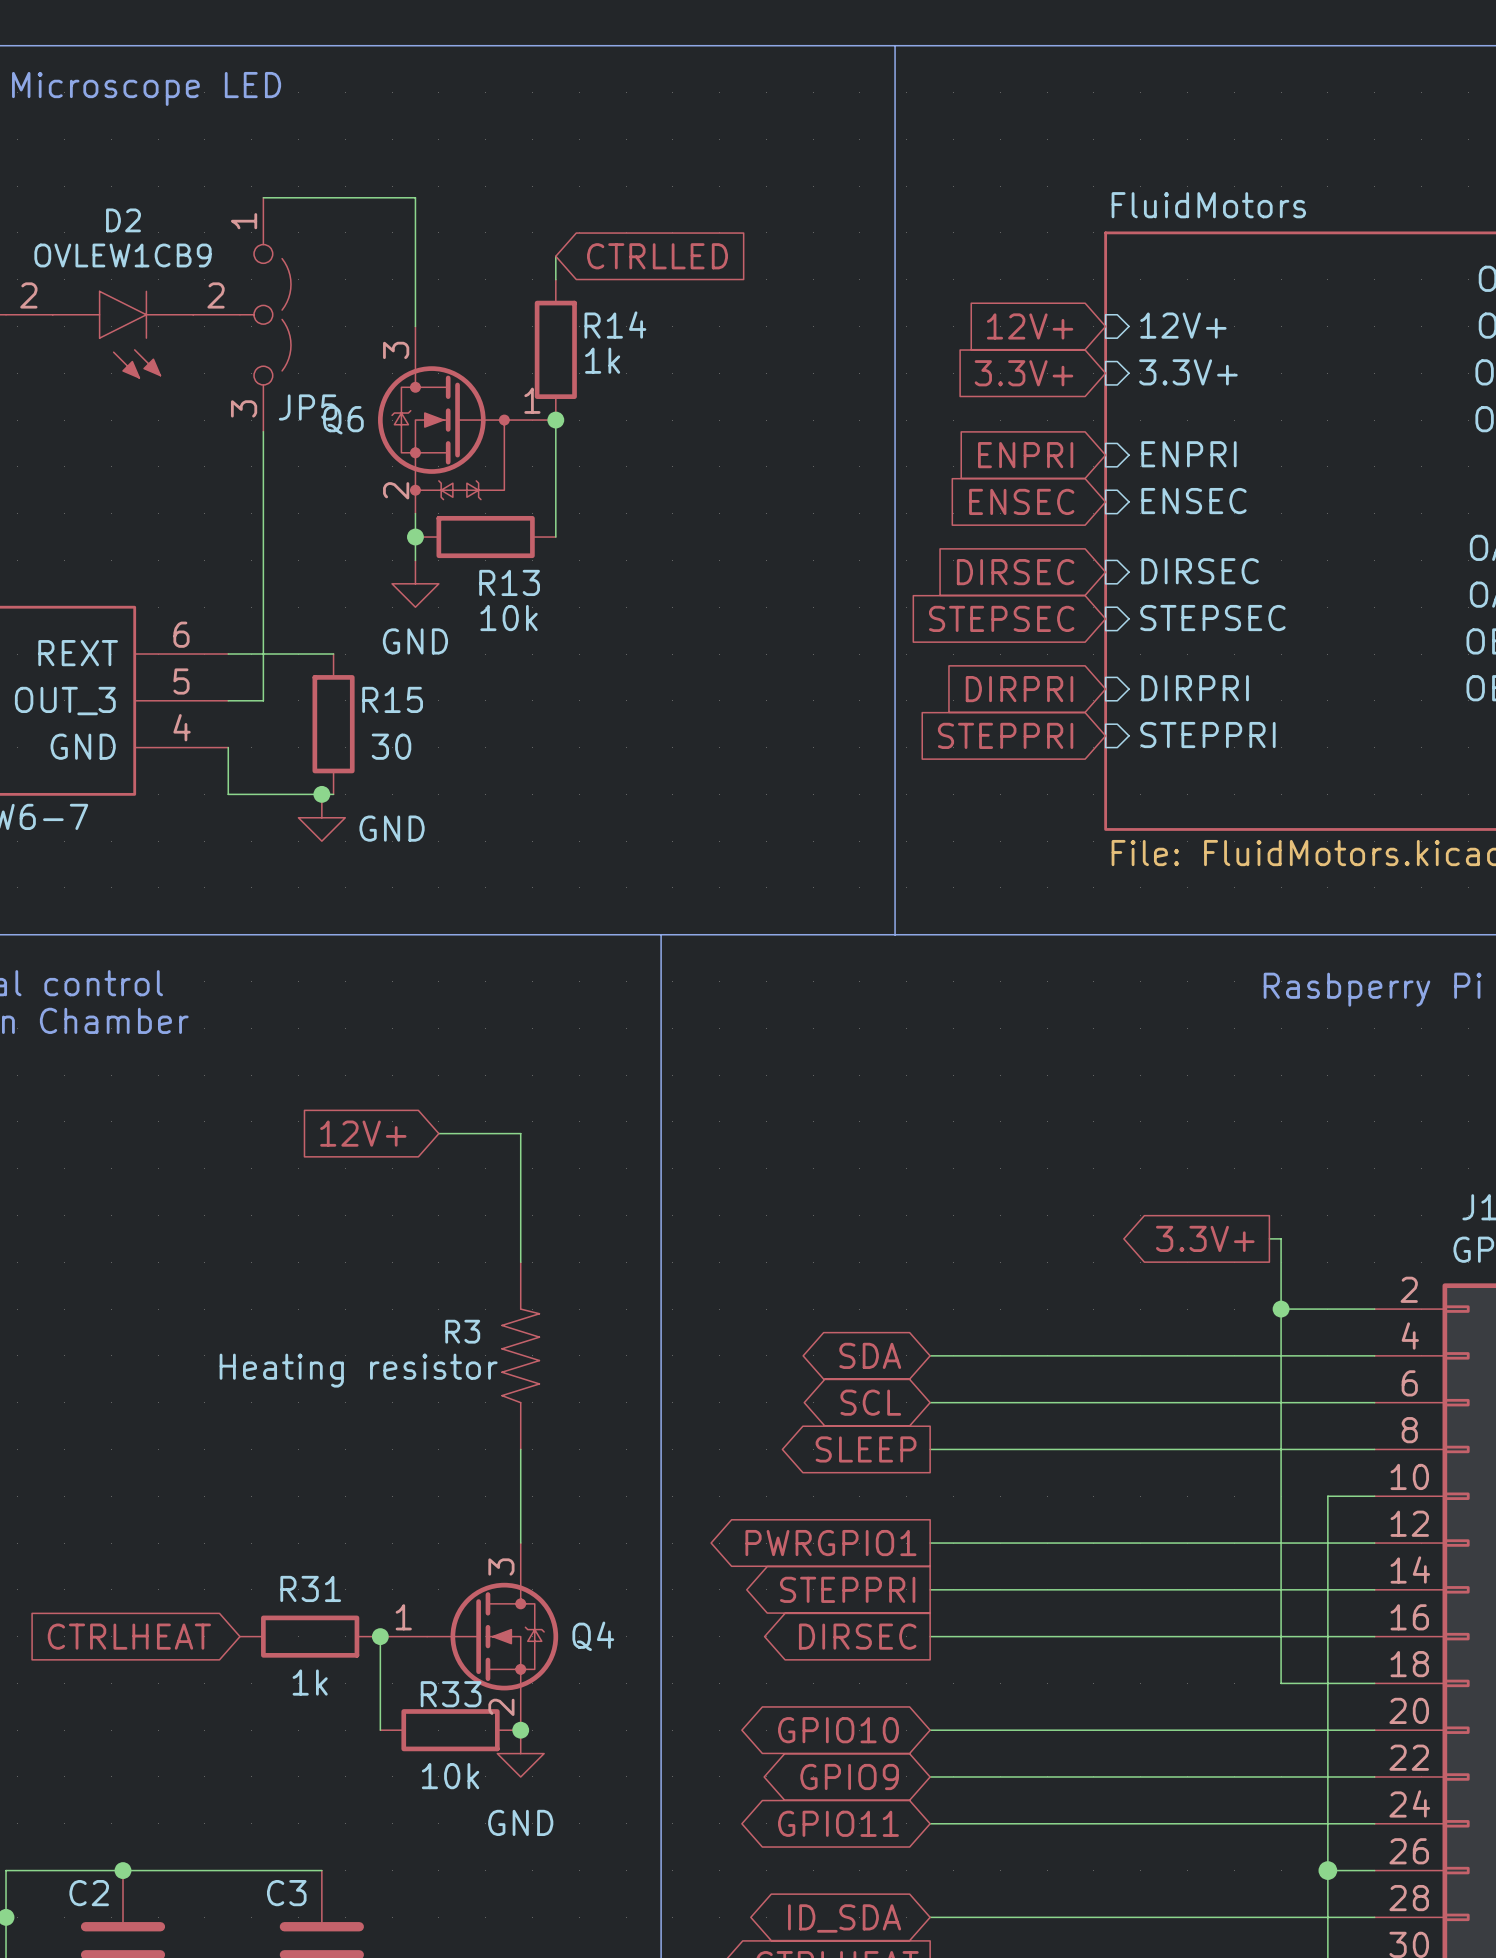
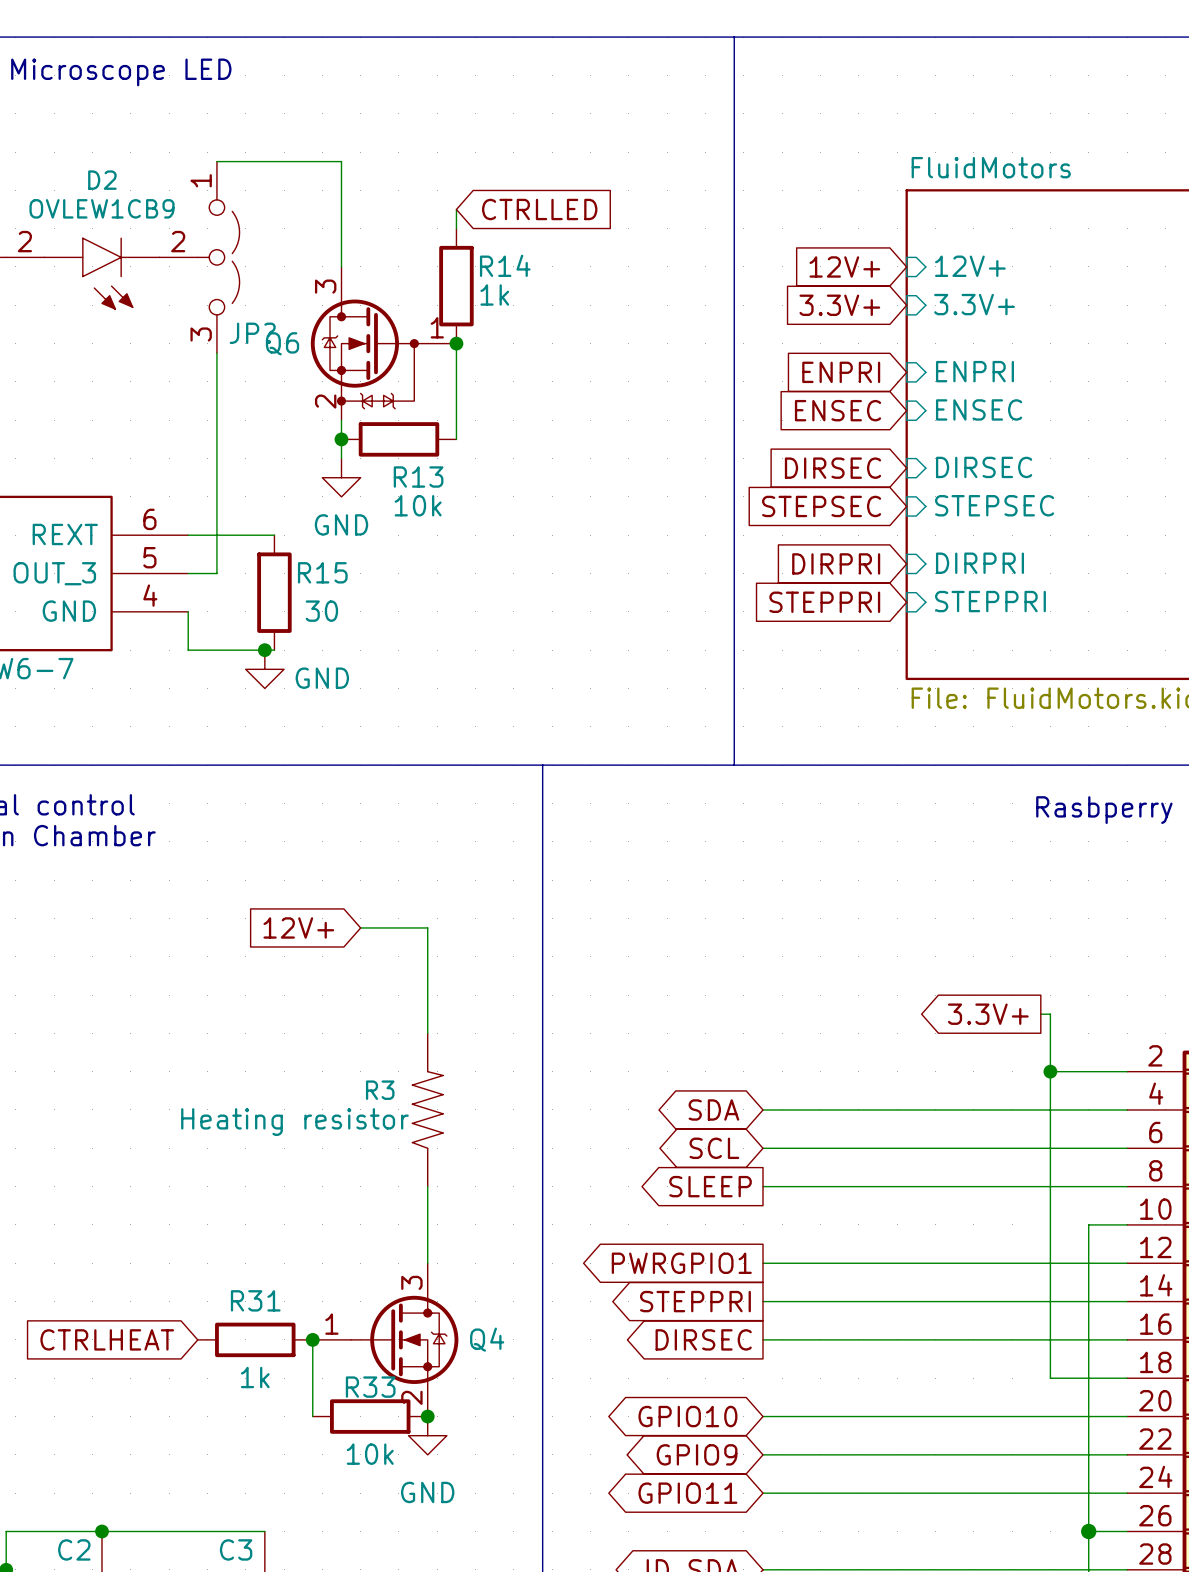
JP5 name: JP5 (308, 407) -> JP? (252, 333)

